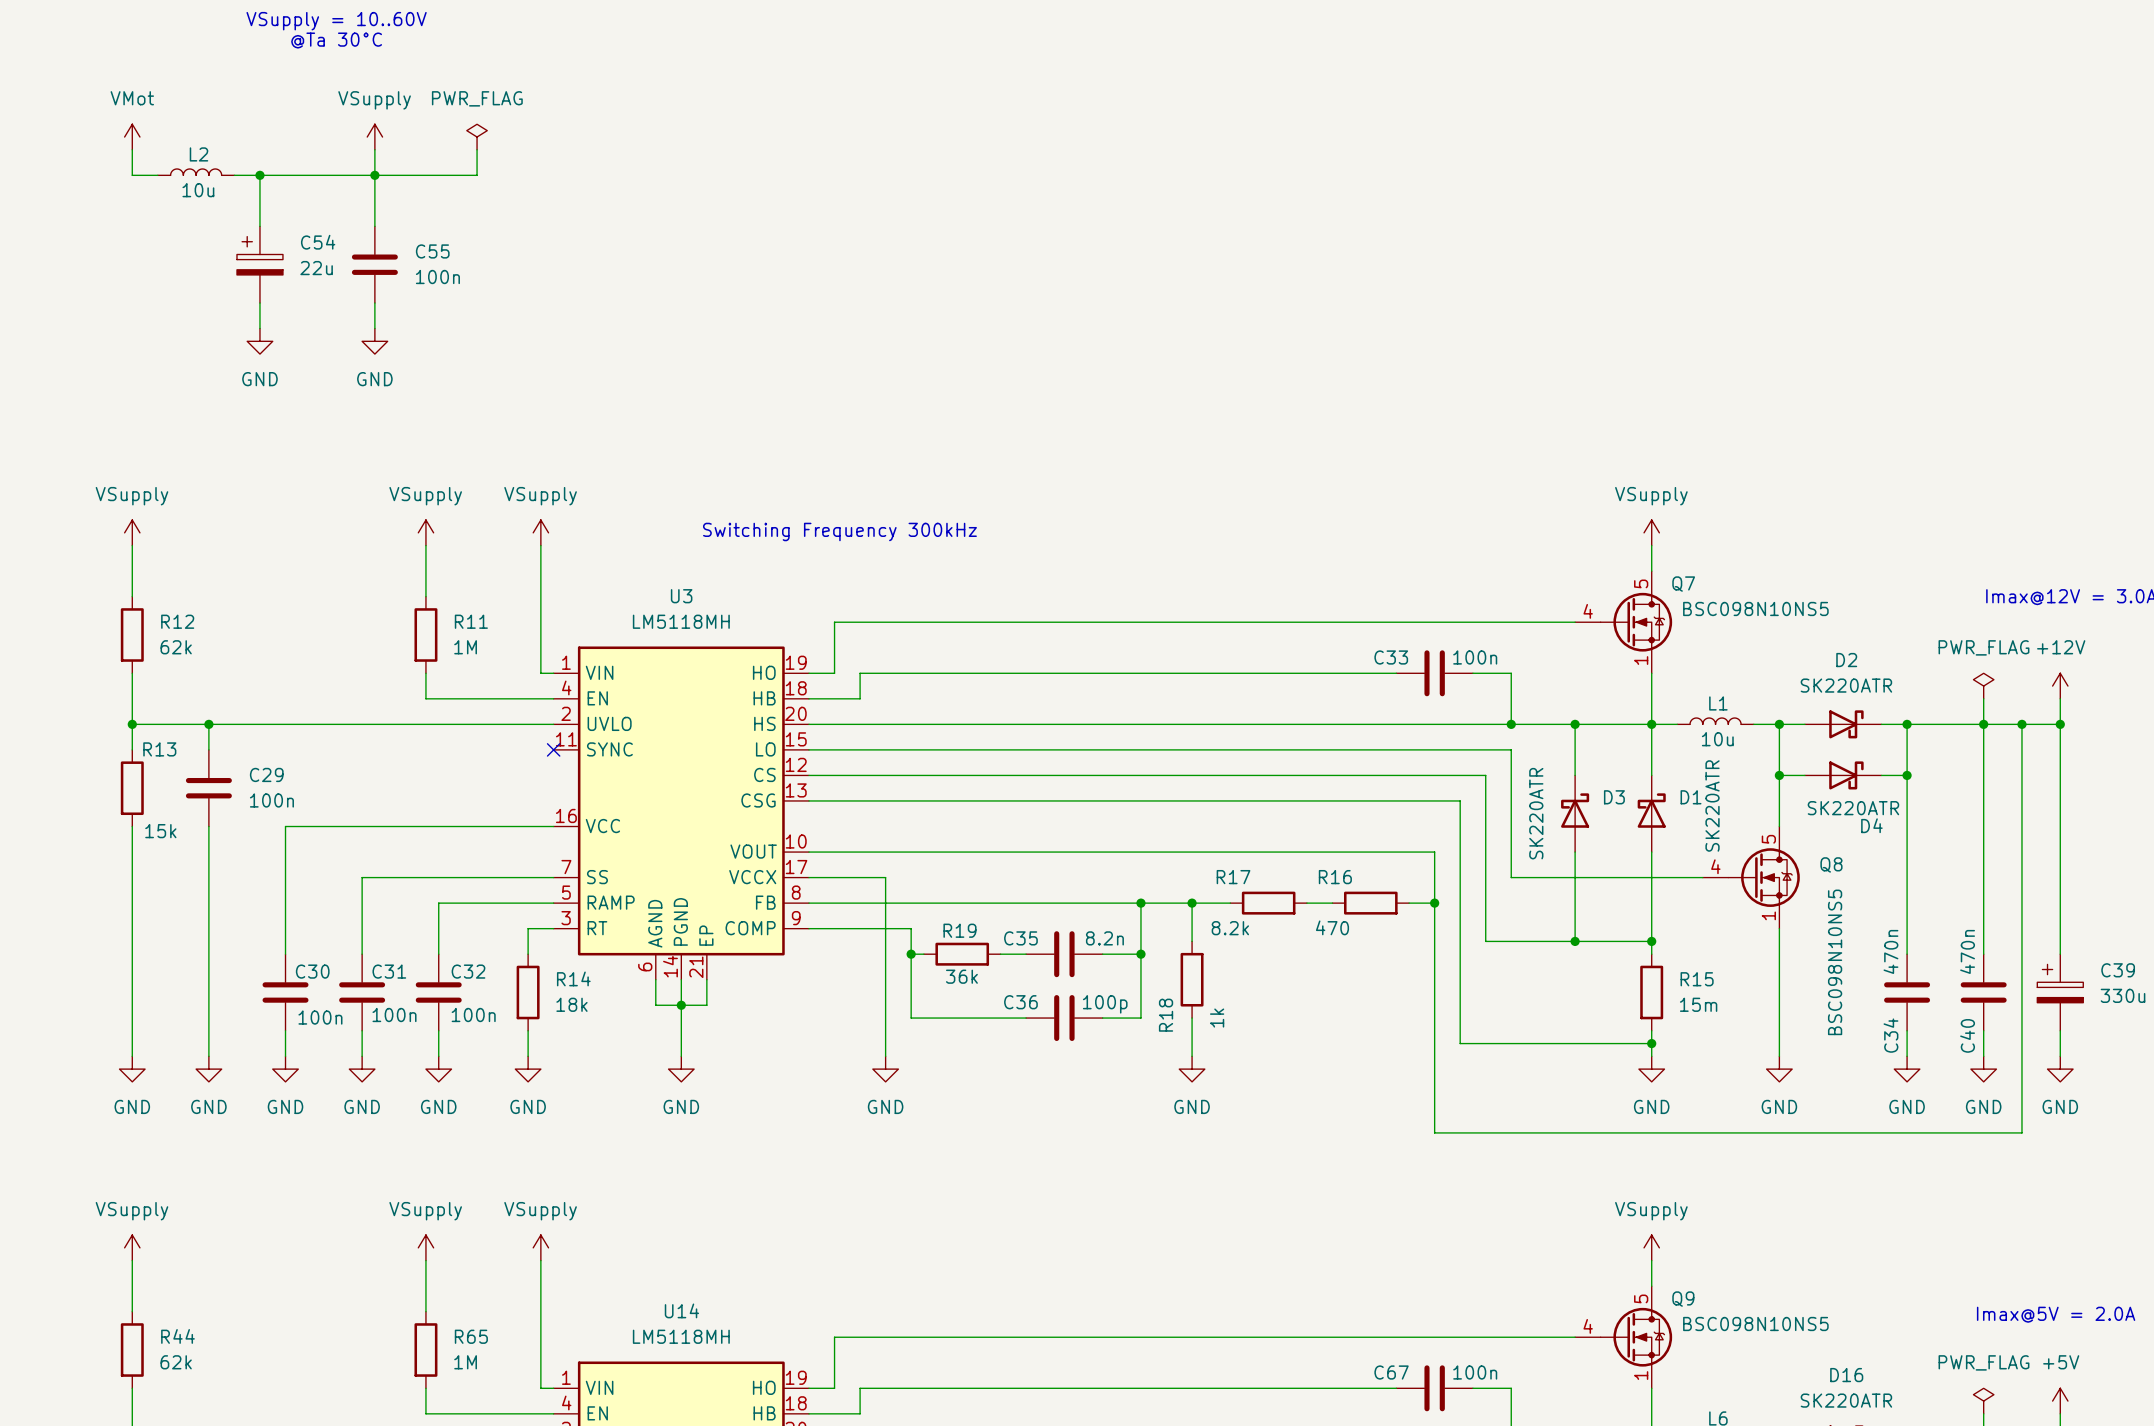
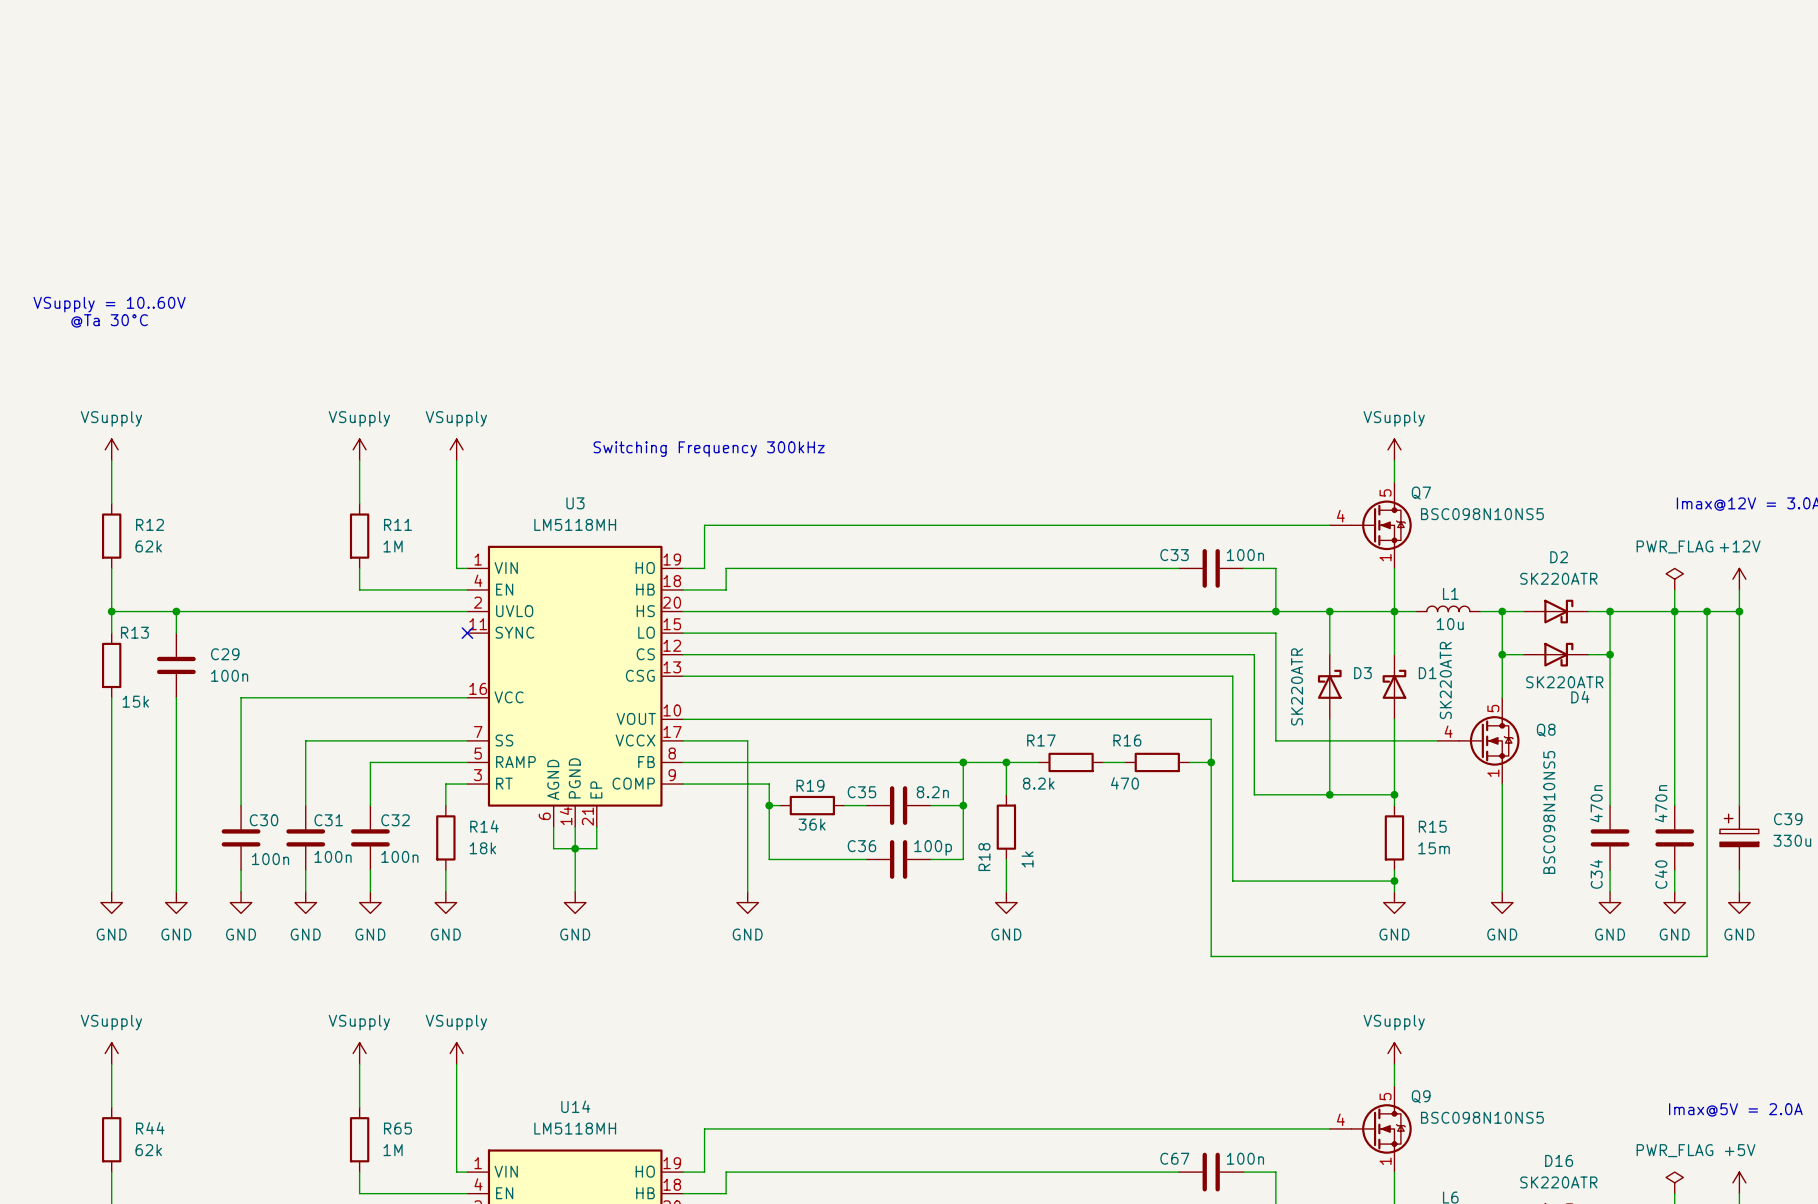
text: VSupply = 10..60V (336, 21) -> none
text: @Ta 30°C (336, 40) -> none
power symbol: VMot (132, 137) -> none
power symbol: VSupply (374, 137) -> none
power symbol: PWR_FLAG (477, 137) -> none
wire: (132, 149) (132, 175) (157, 175) -> none
wire: (374, 149) (374, 226) -> none
wire: (477, 149) (477, 175) (234, 175) -> none
L2: 10u (196, 172) -> none
wire: (259, 175) (259, 226) -> none
junction: (259, 175) -> none
junction: (374, 175) -> none
C54: 22u (259, 264) -> none
C55: 100n (374, 264) -> none
wire: (259, 303) (259, 328) -> none
wire: (374, 303) (374, 328) -> none
power symbol: GND (259, 341) -> none
power symbol: GND (374, 341) -> none
text: none -> VSupply = 10..60V (109, 304)
text: none -> @Ta 30°C (109, 320)

